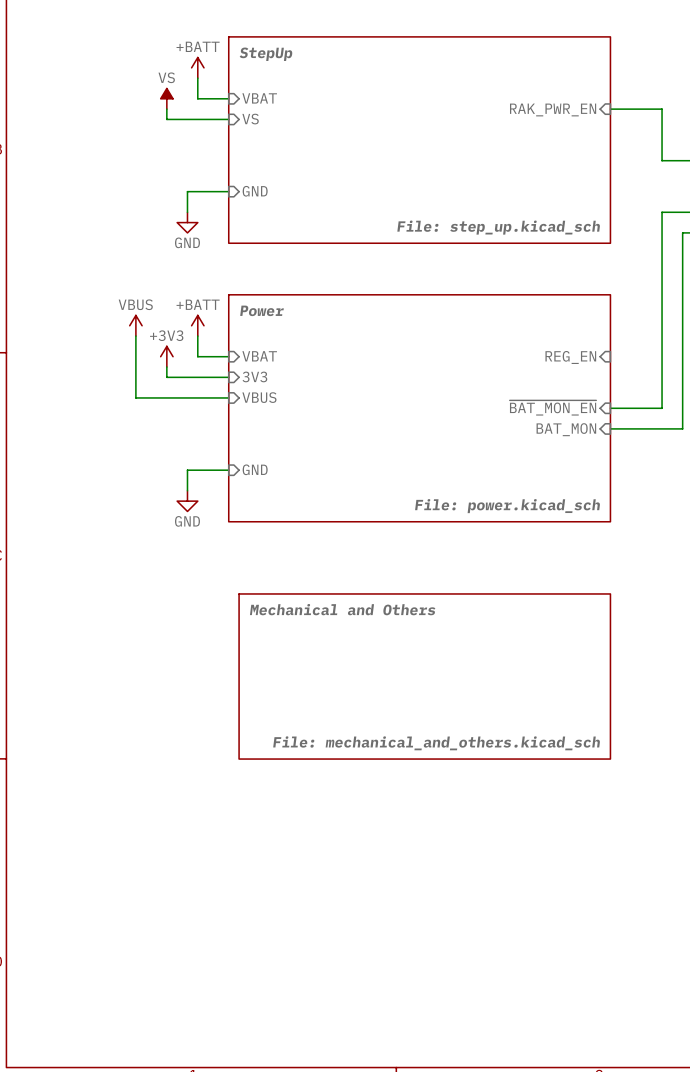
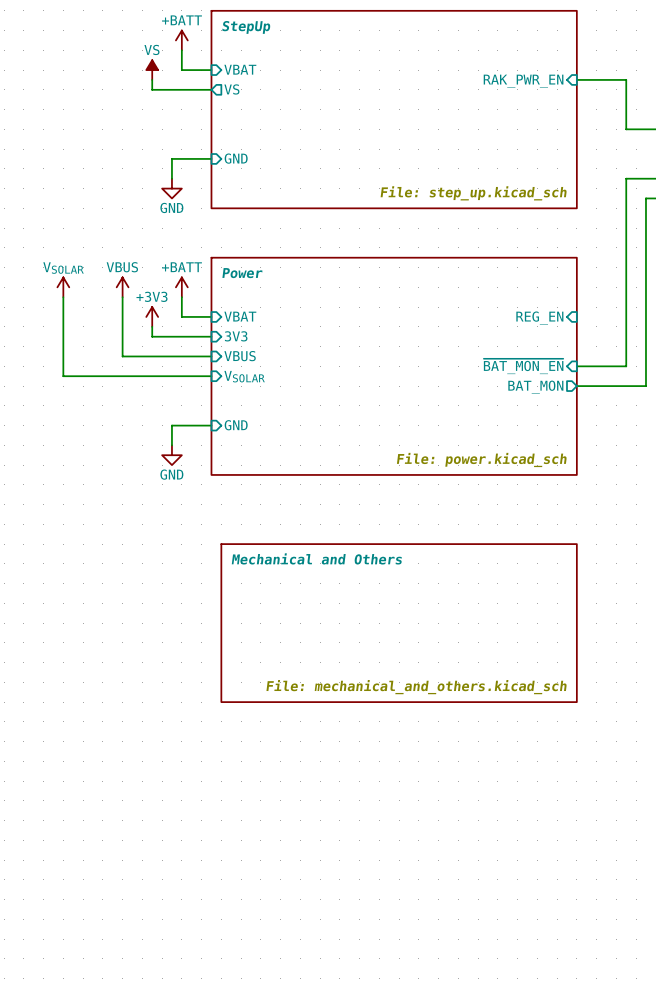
sheet pin shape: input (250, 119) -> output (231, 89)
power symbol: none -> VSOLAR (63, 287)
wire: none -> (63, 297) (63, 376) (211, 376)
sheet pin: none -> VSOLAR (244, 376)
sheet pin shape: input (566, 429) -> output (535, 387)

